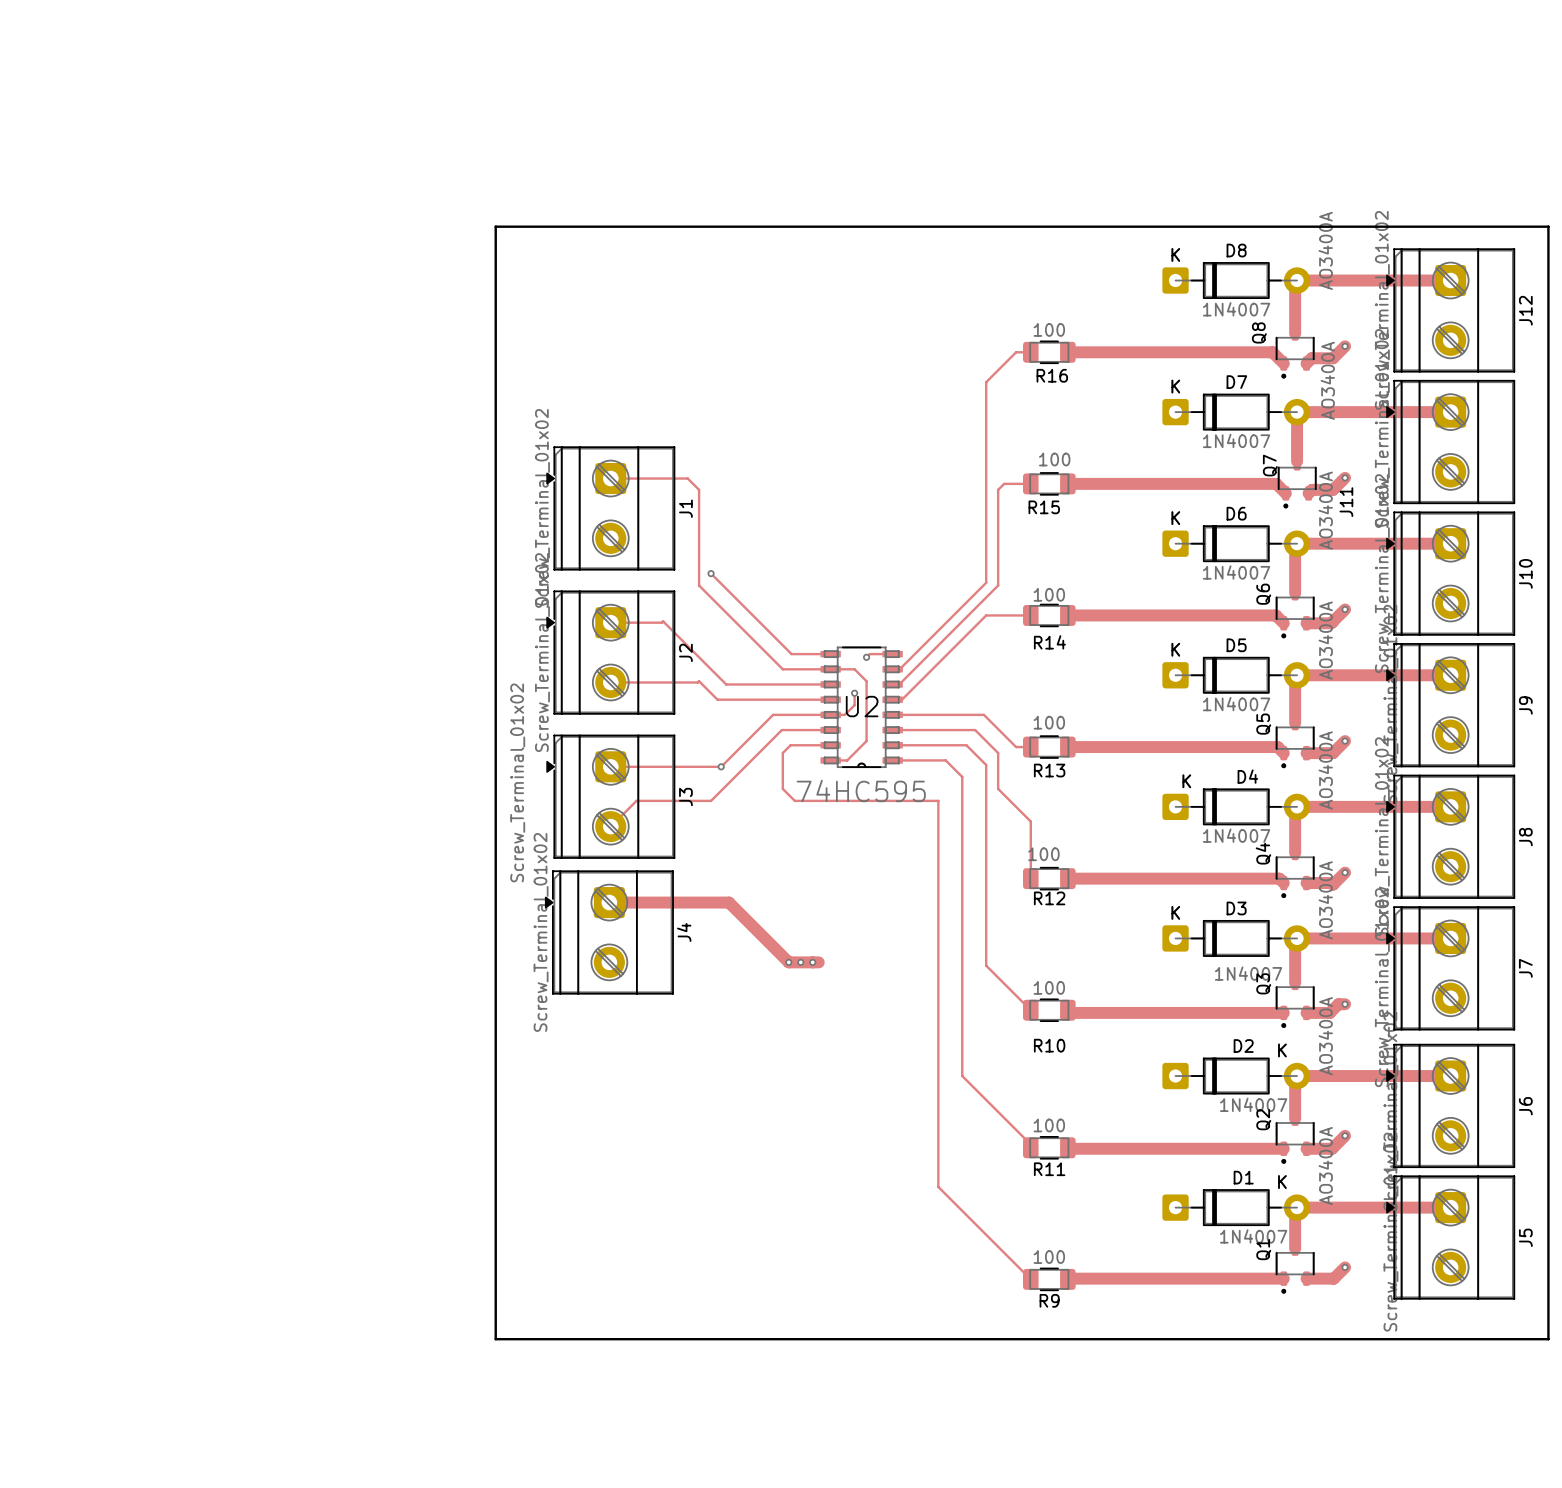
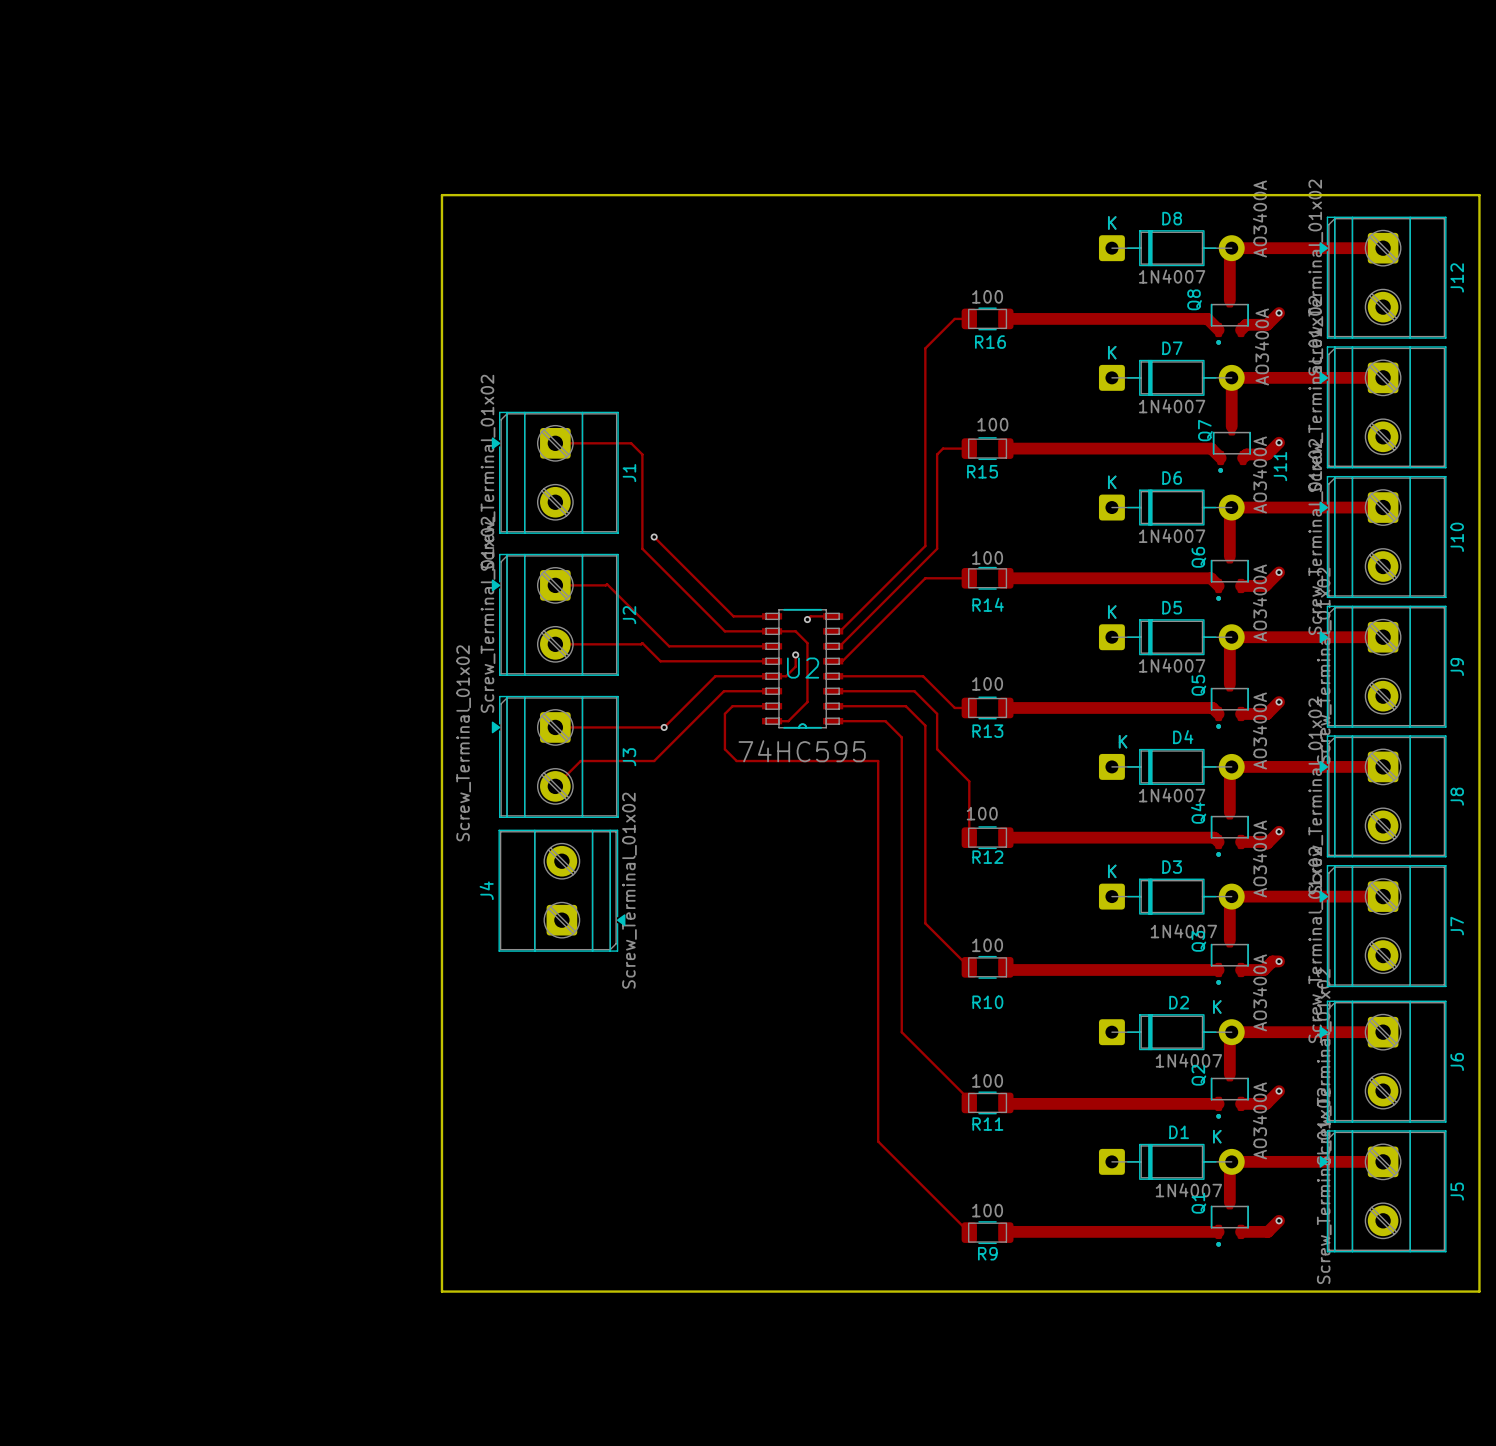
track: (609, 902) (729, 902) (788, 962) (818, 962) -> none
J4 rotation: 0° (609, 932) -> 180° (561, 890)
via: (788, 962) -> none
via: (800, 962) -> none
via: (812, 962) -> none

